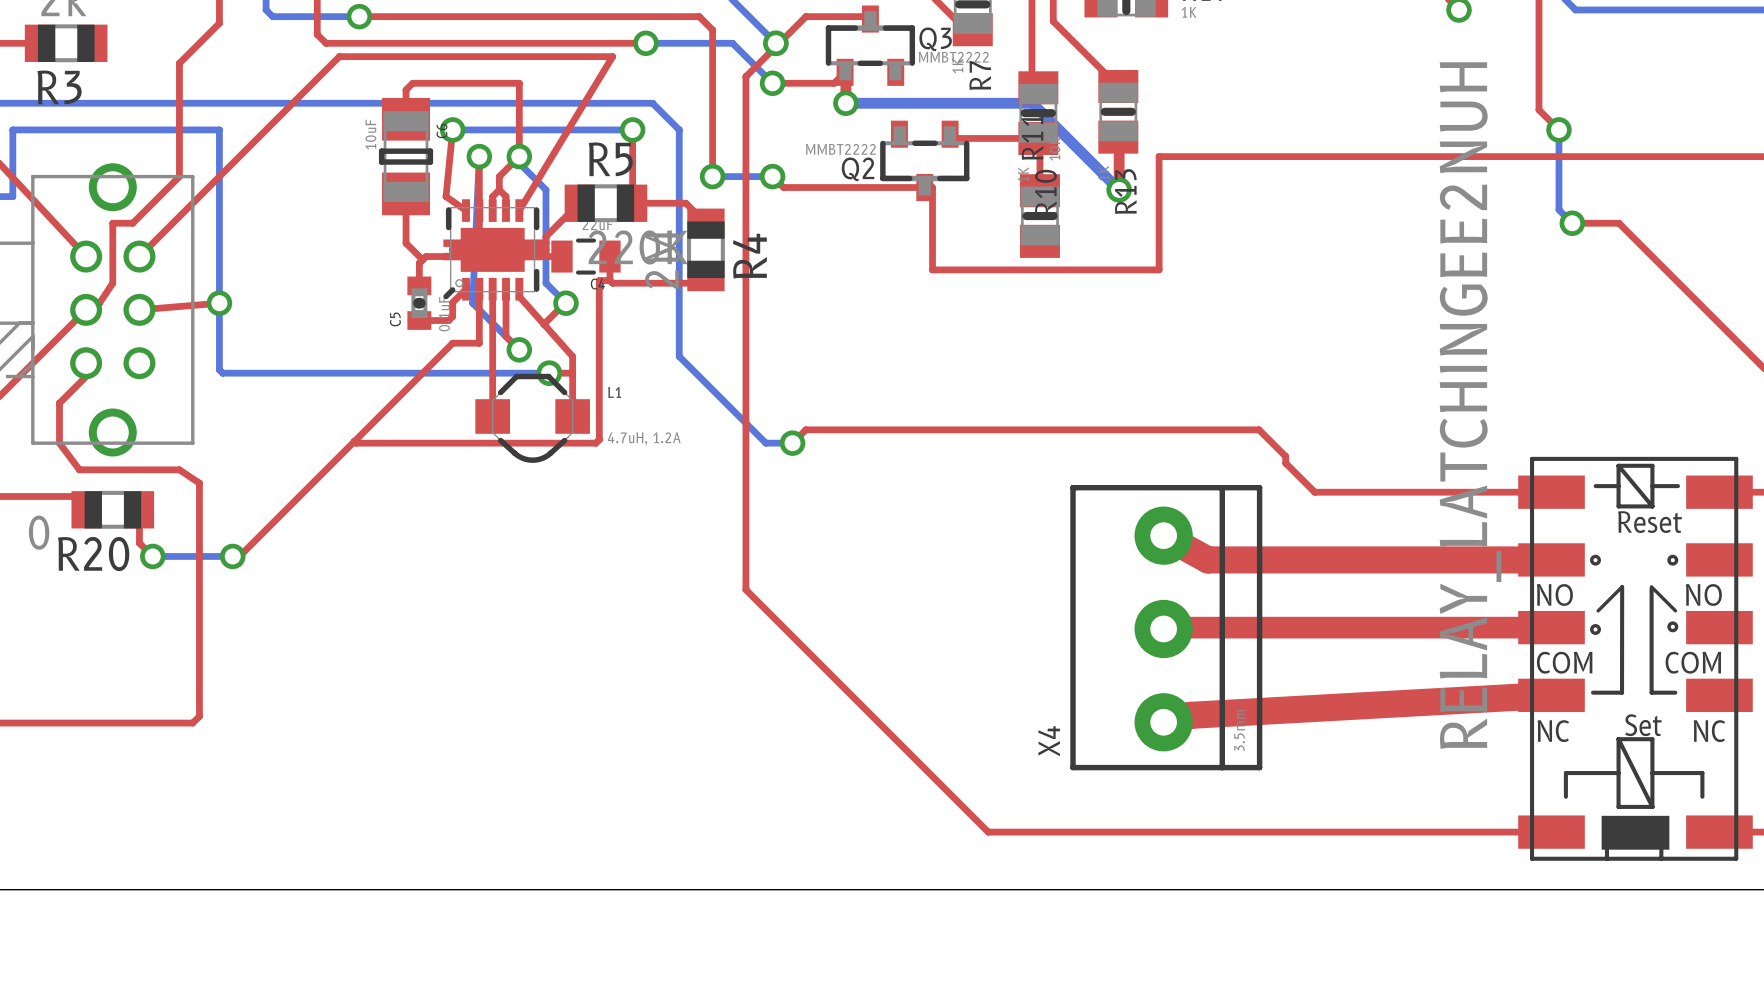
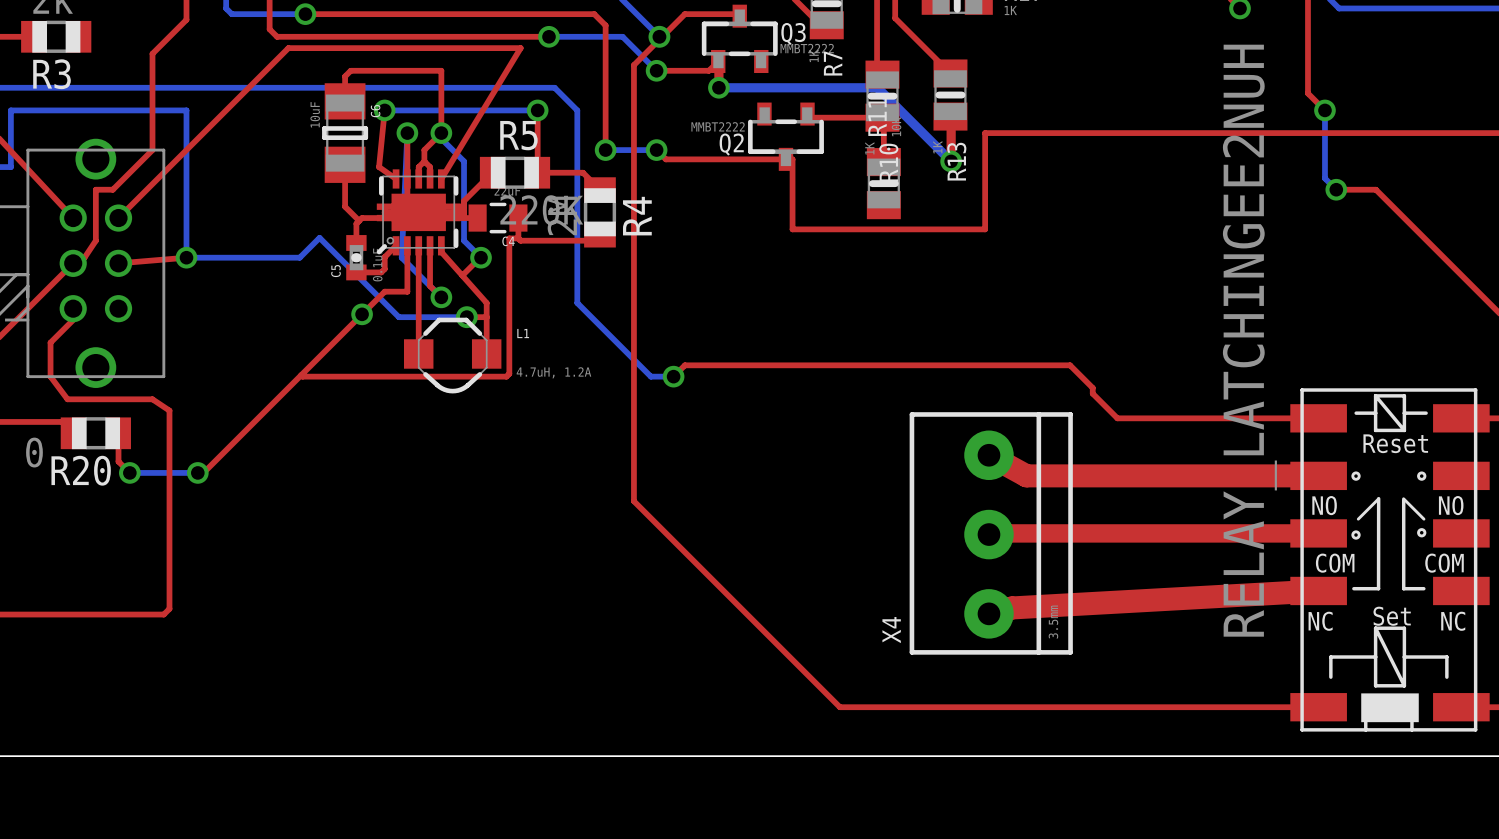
bottom track: (219, 303) (219, 369) (222, 373) (469, 373) -> (186, 257) (299, 257) (319, 237) (398, 317)
via: none -> (362, 314)

